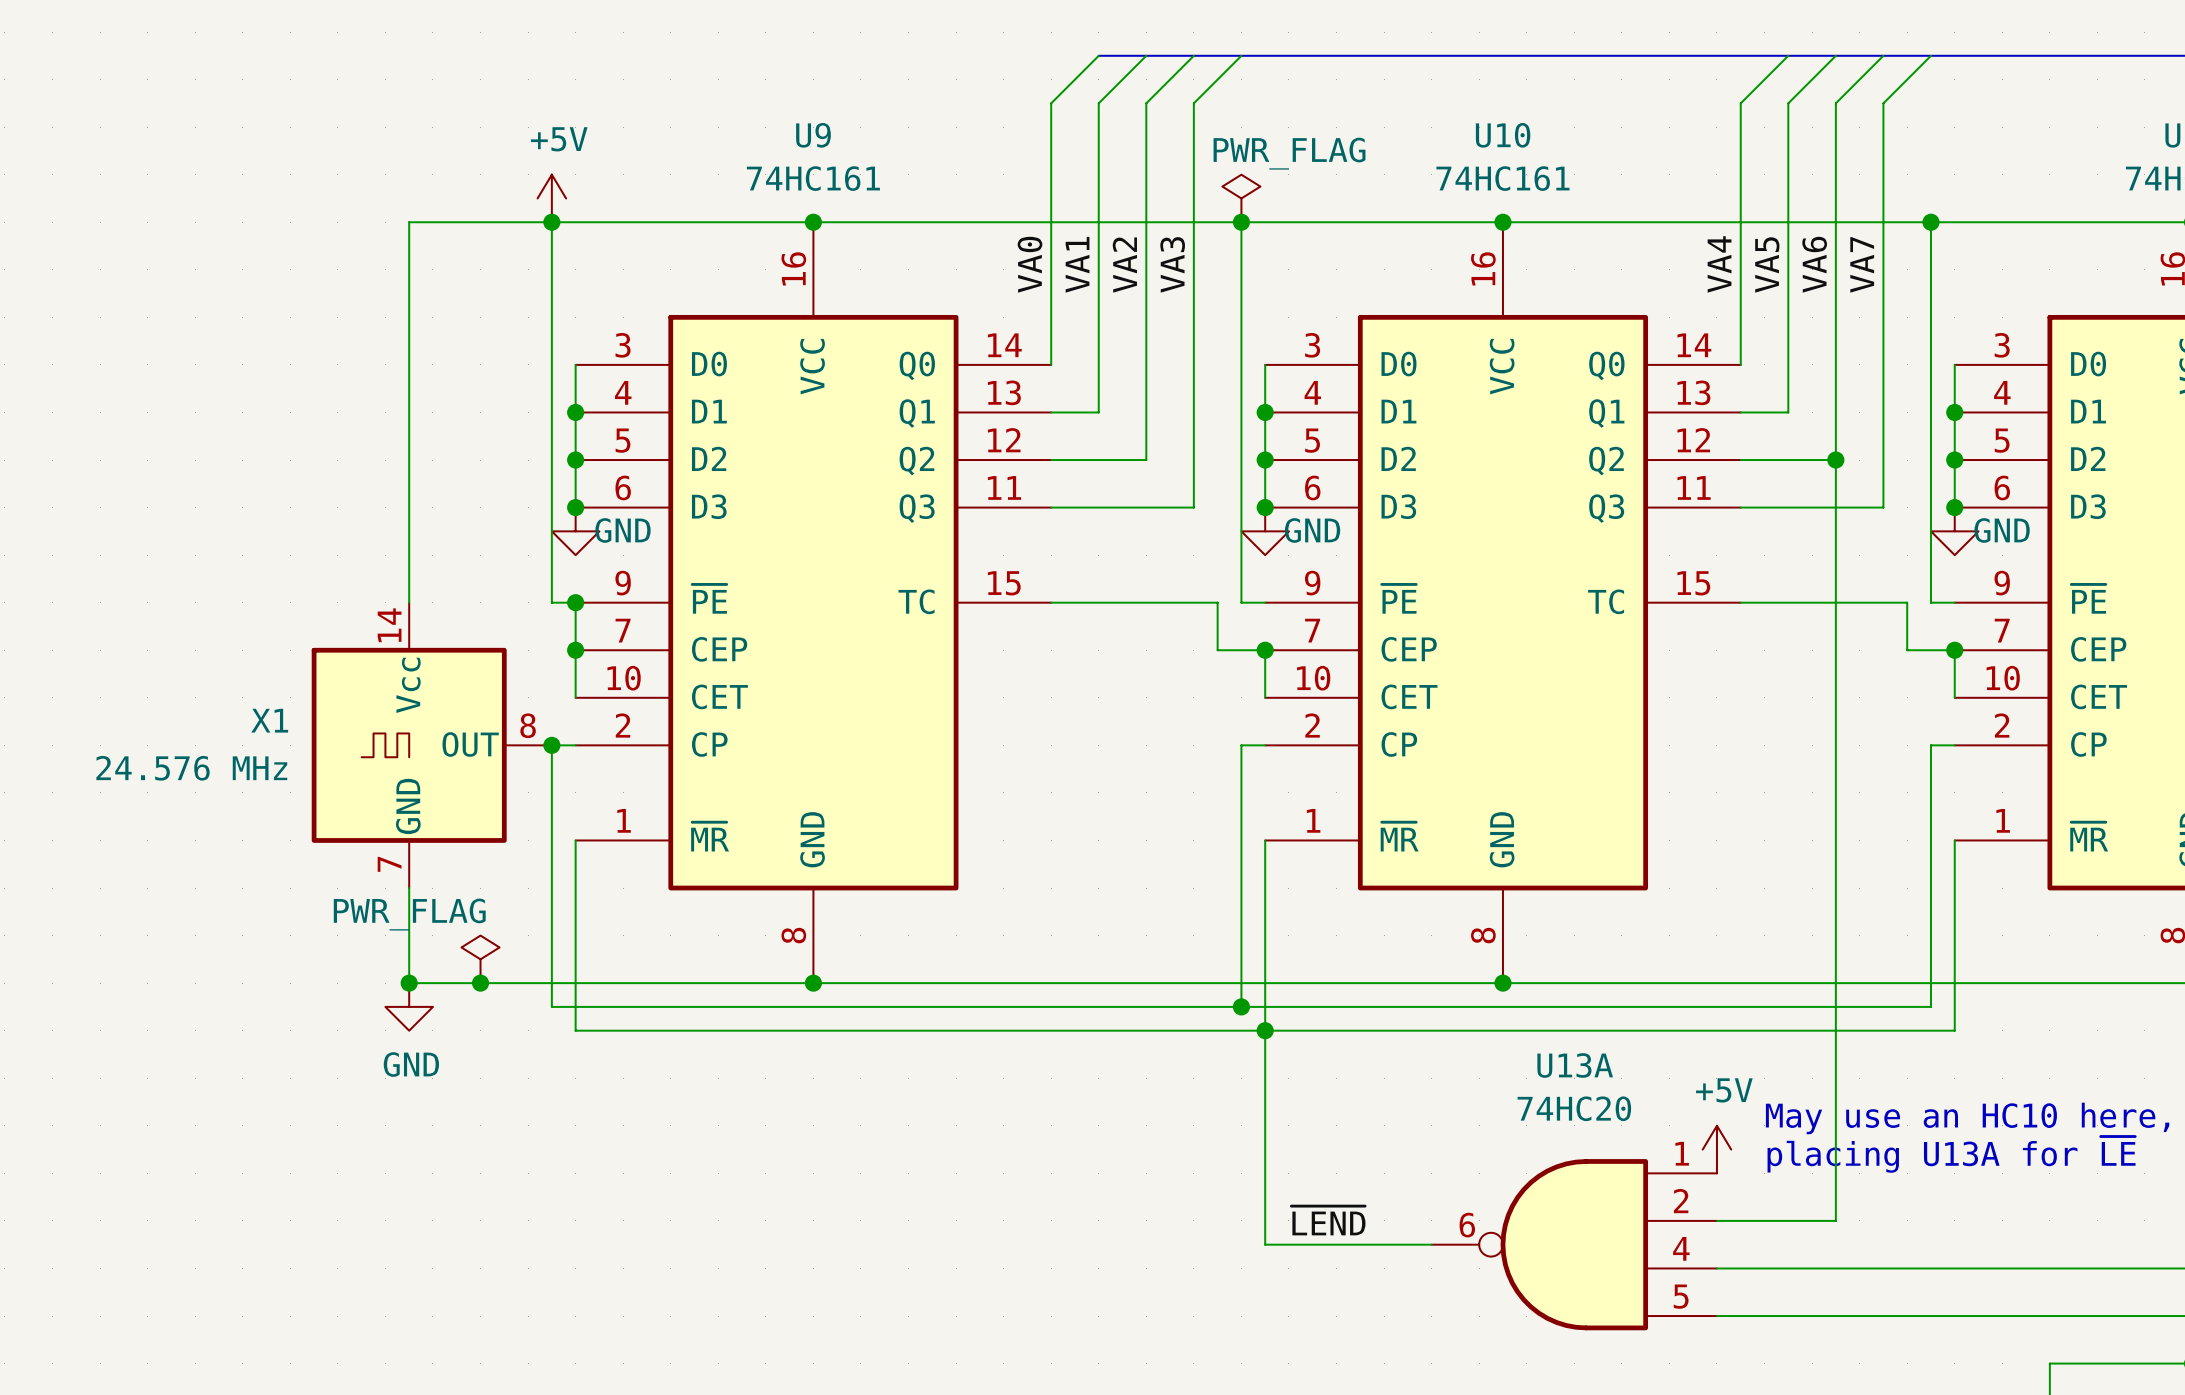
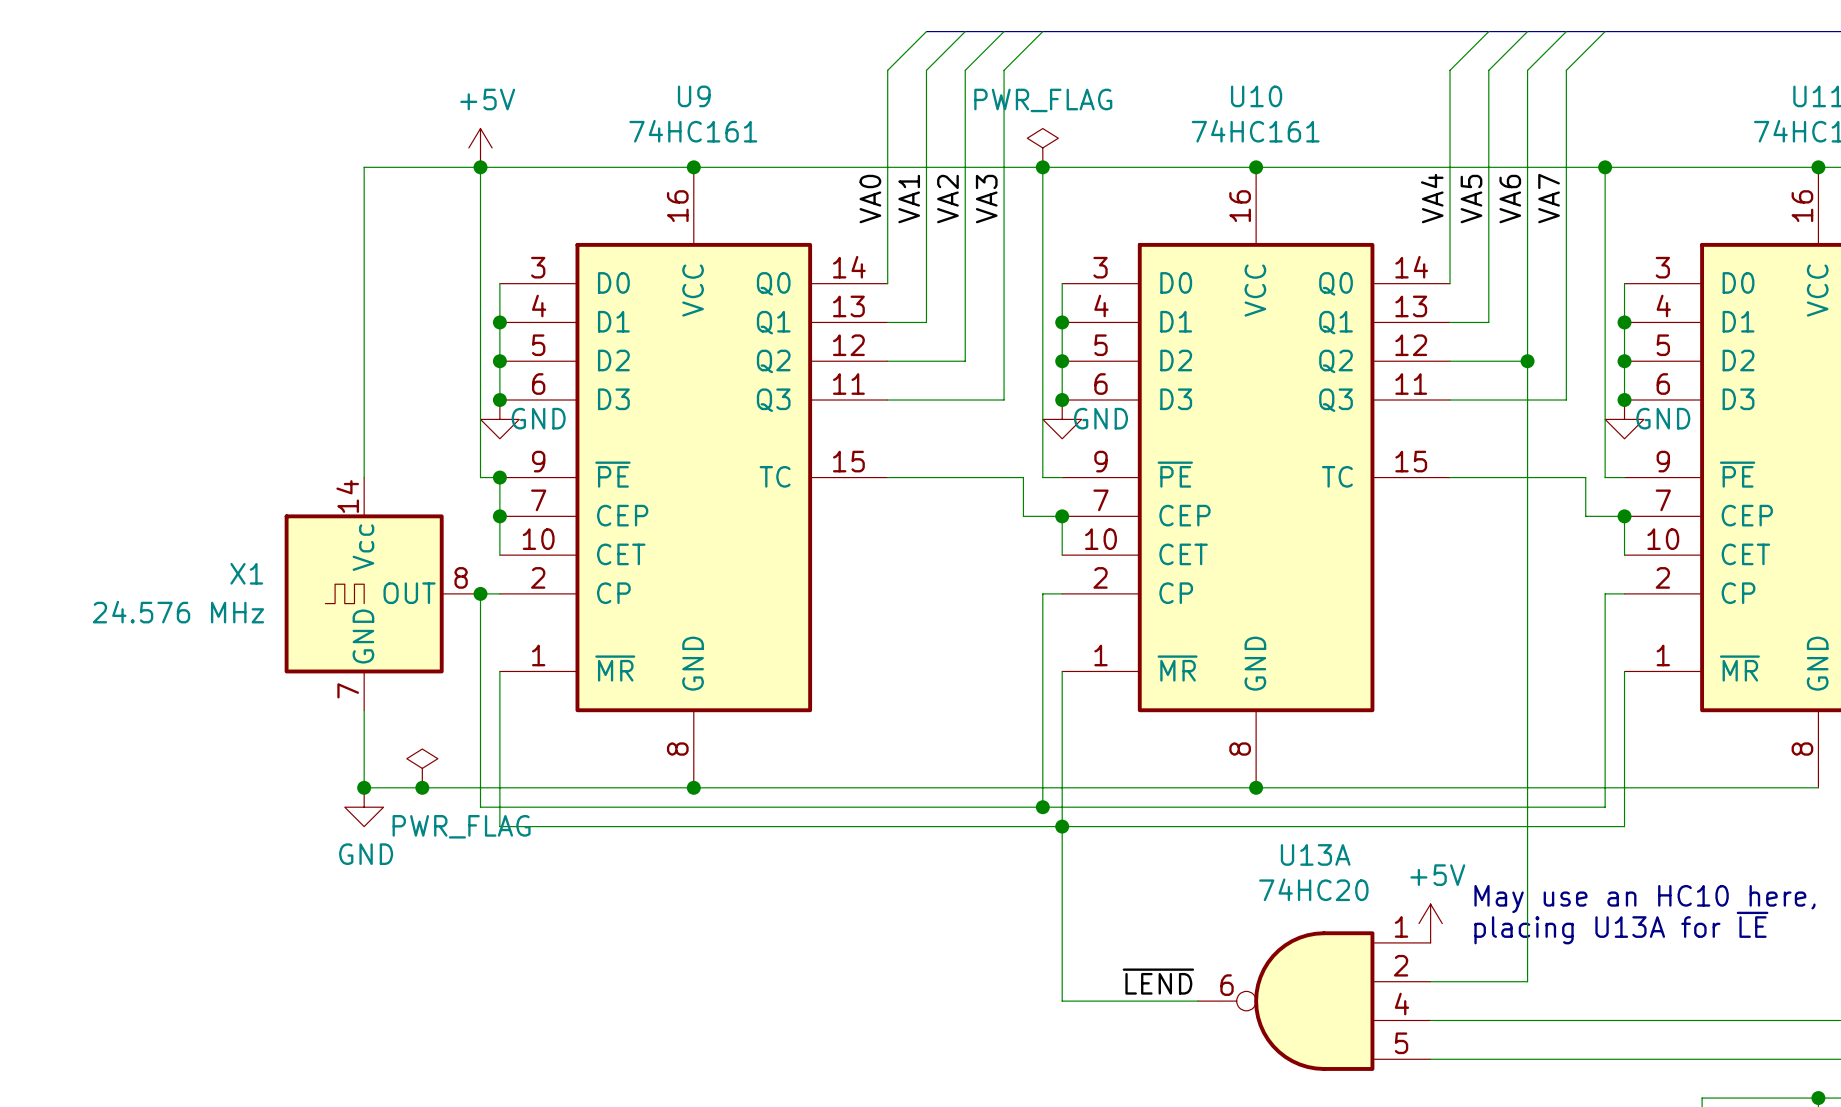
power symbol text position: PWR_FLAG (1289, 153) -> PWR_FLAG (1043, 100)
power symbol text position: PWR_FLAG (409, 914) -> PWR_FLAG (461, 826)
label position: ~{LEND} (1328, 1220) -> ~{LEND} (1158, 981)

